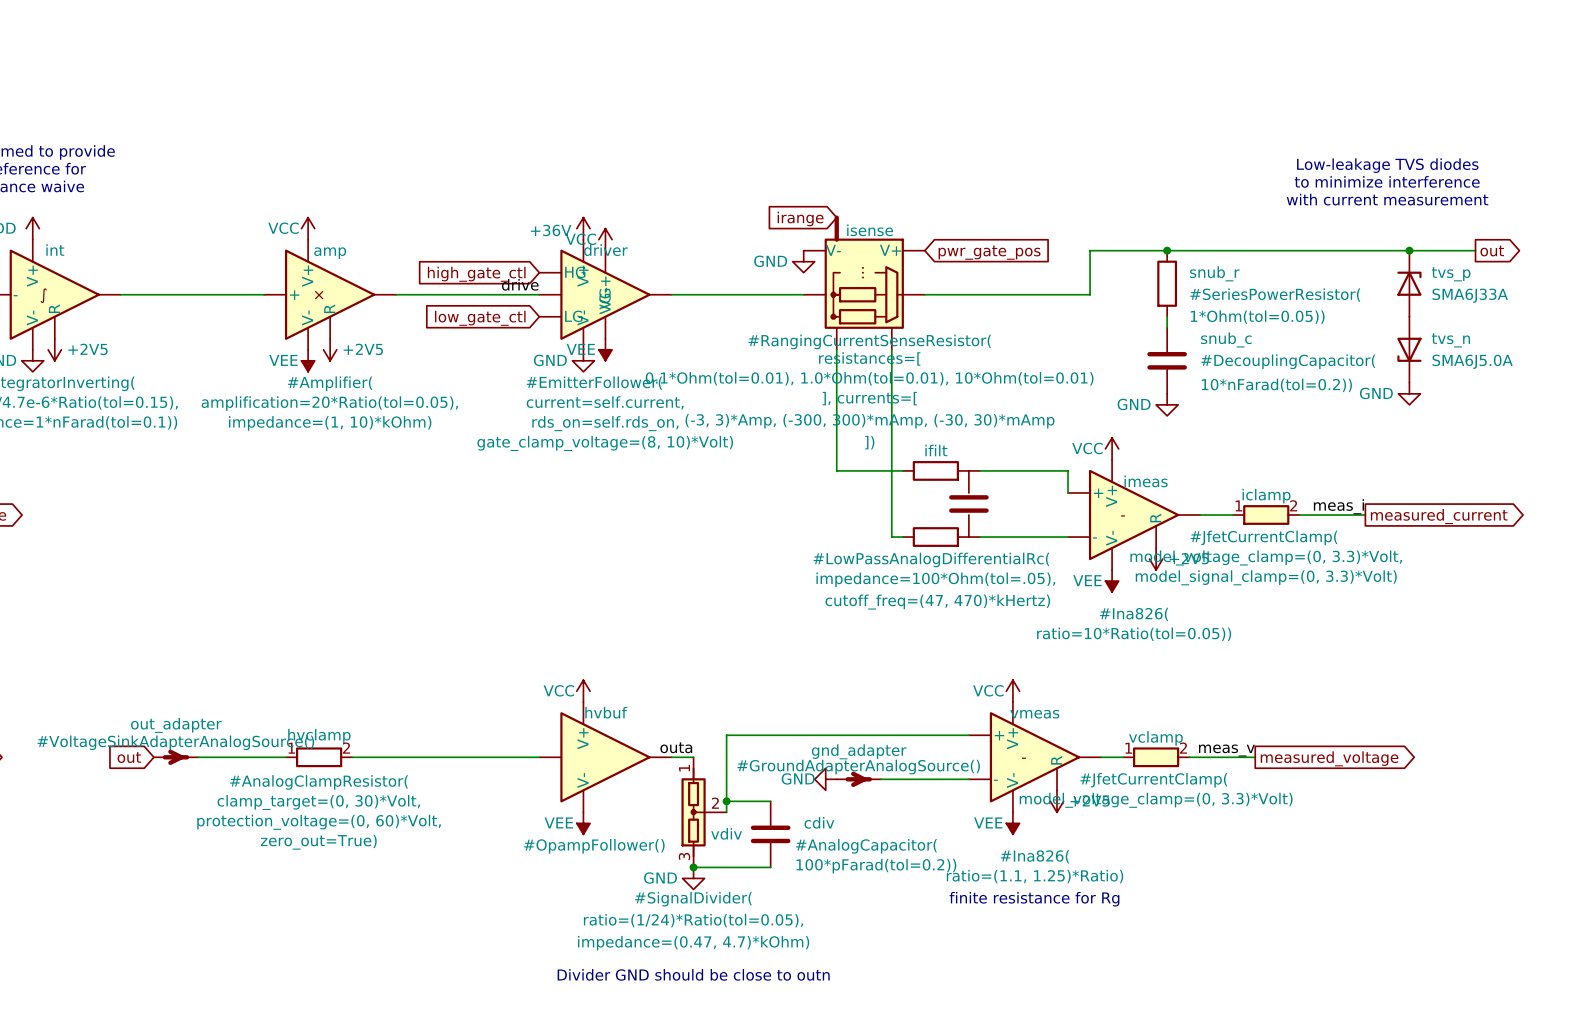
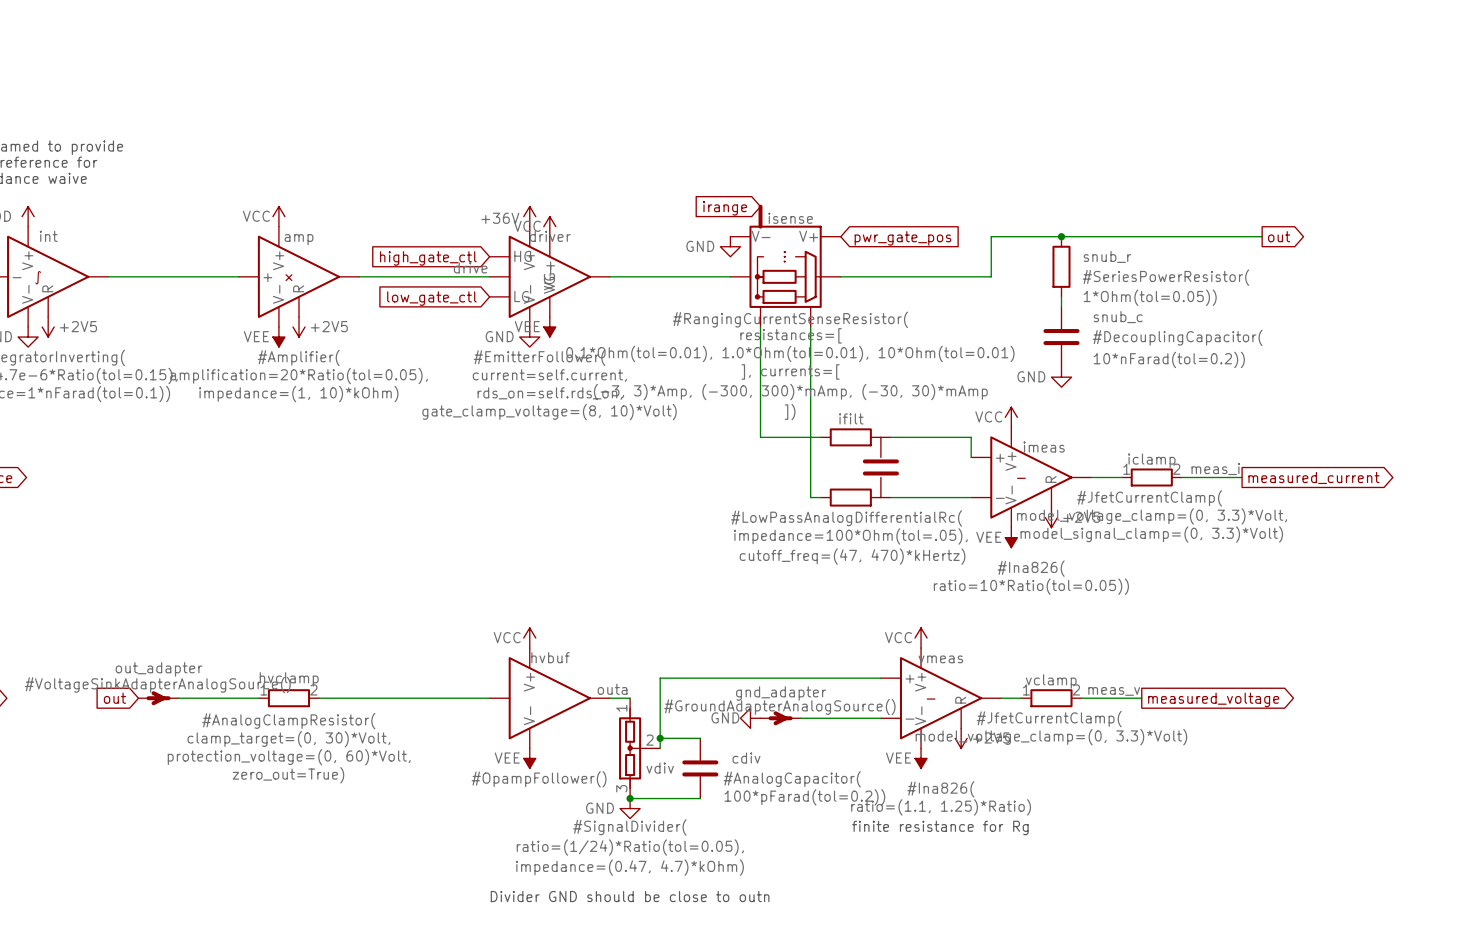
text: Low-leakage TVS diodes (1387, 165) -> none
text: to minimize interference (1387, 181) -> none
text: with current measurement (1387, 199) -> none
wire: (1387, 250) (1475, 250) -> none
junction: (1409, 250) -> none
global label position: out (1492, 250) -> out (1279, 236)
tvs_p: SMA6J33A (1409, 283) -> none
tvs_n: SMA6J5.0A (1409, 349) -> none
power symbol: GND (1409, 393) -> none

